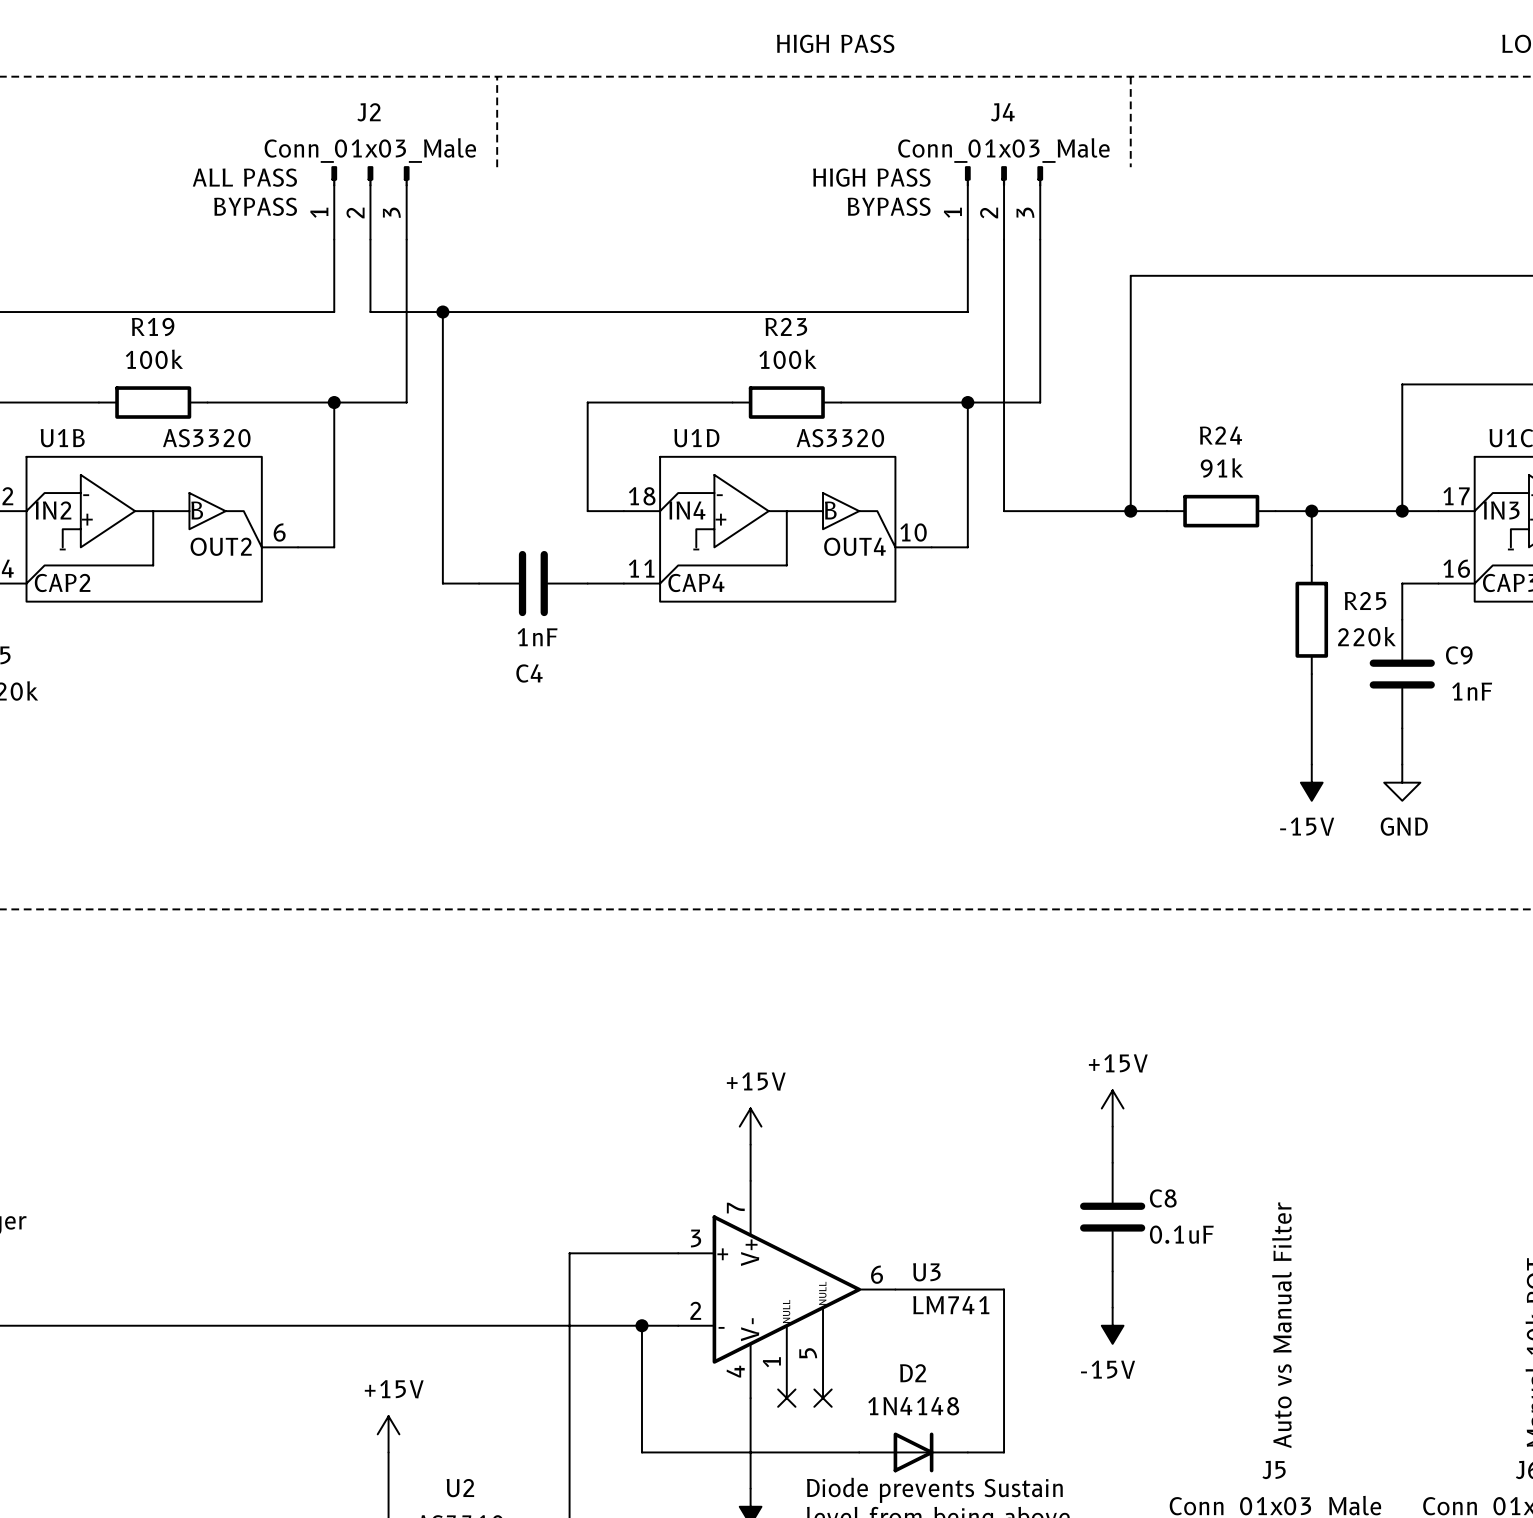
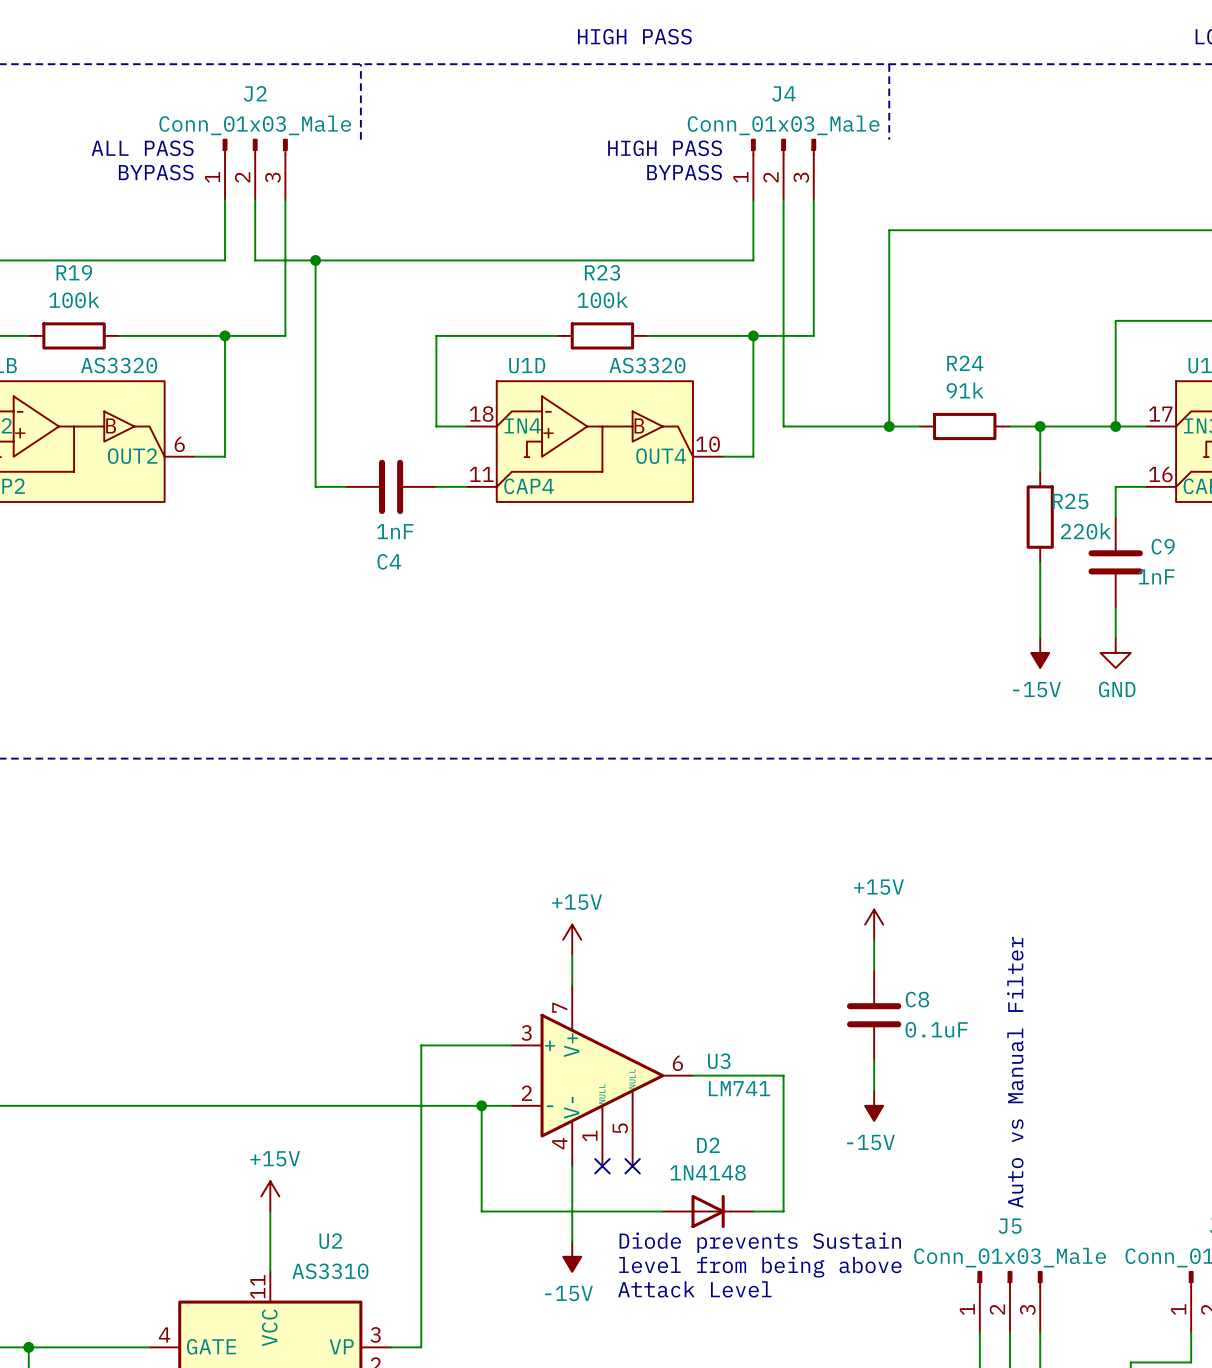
R25 name position: R25 (1365, 600) -> R25 (1070, 501)
C9 value position: 1nF (1472, 691) -> 1nF (1156, 576)

